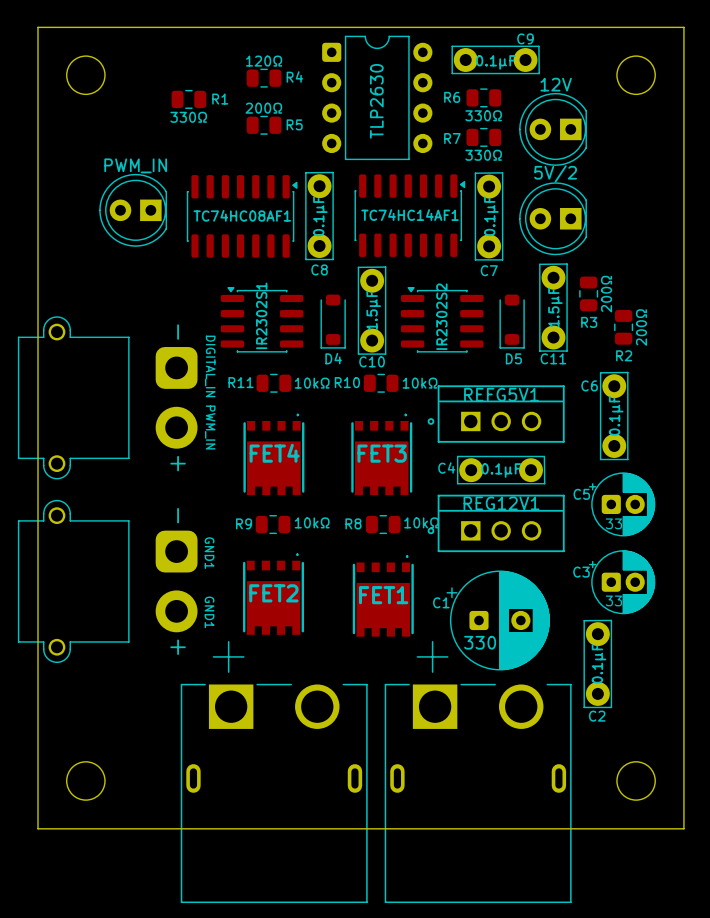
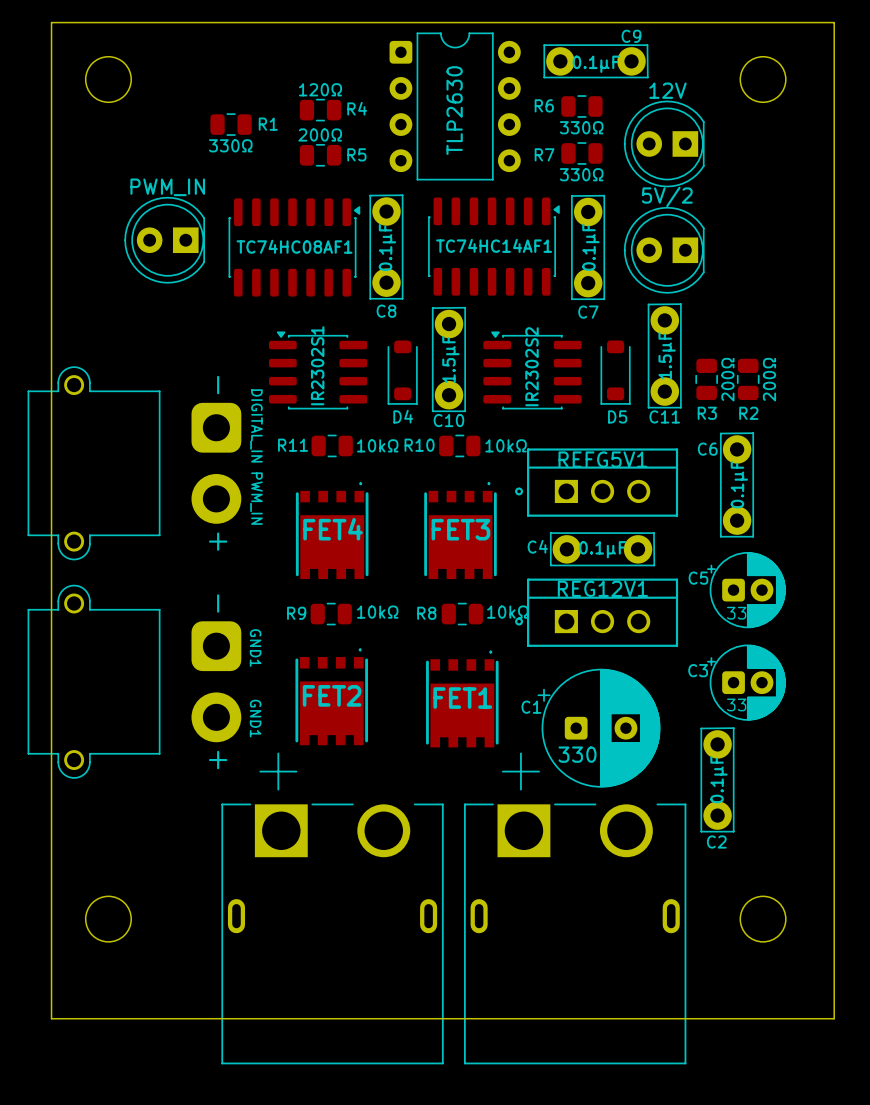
board edge: (683, 27) (683, 828) (38, 828) -> (819, 22) (834, 22) (834, 1018) (51, 1018) (51, 976)
R4 position: (264, 78) -> (320, 110)
R1 position: (188, 99) -> (231, 124)
R5 position: (264, 125) -> (320, 155)
R3 position: (588, 293) -> (706, 379)

